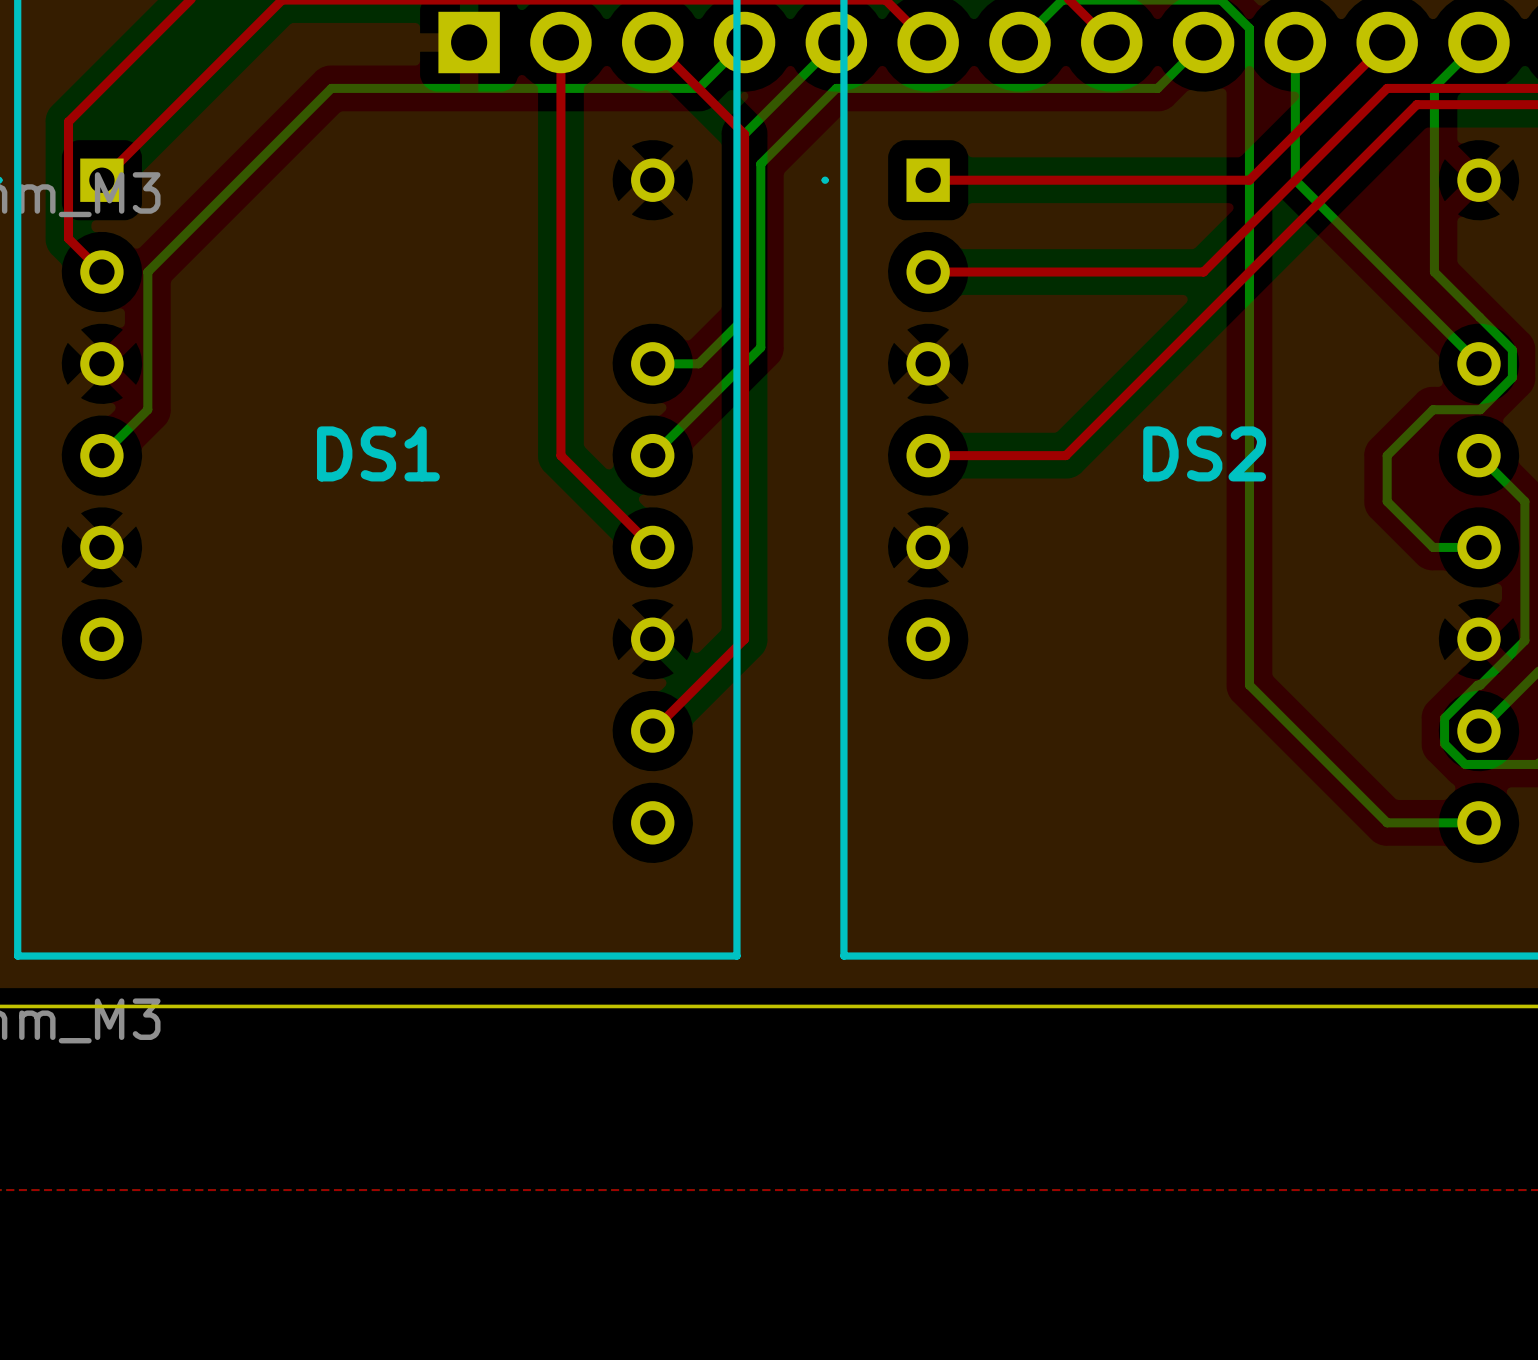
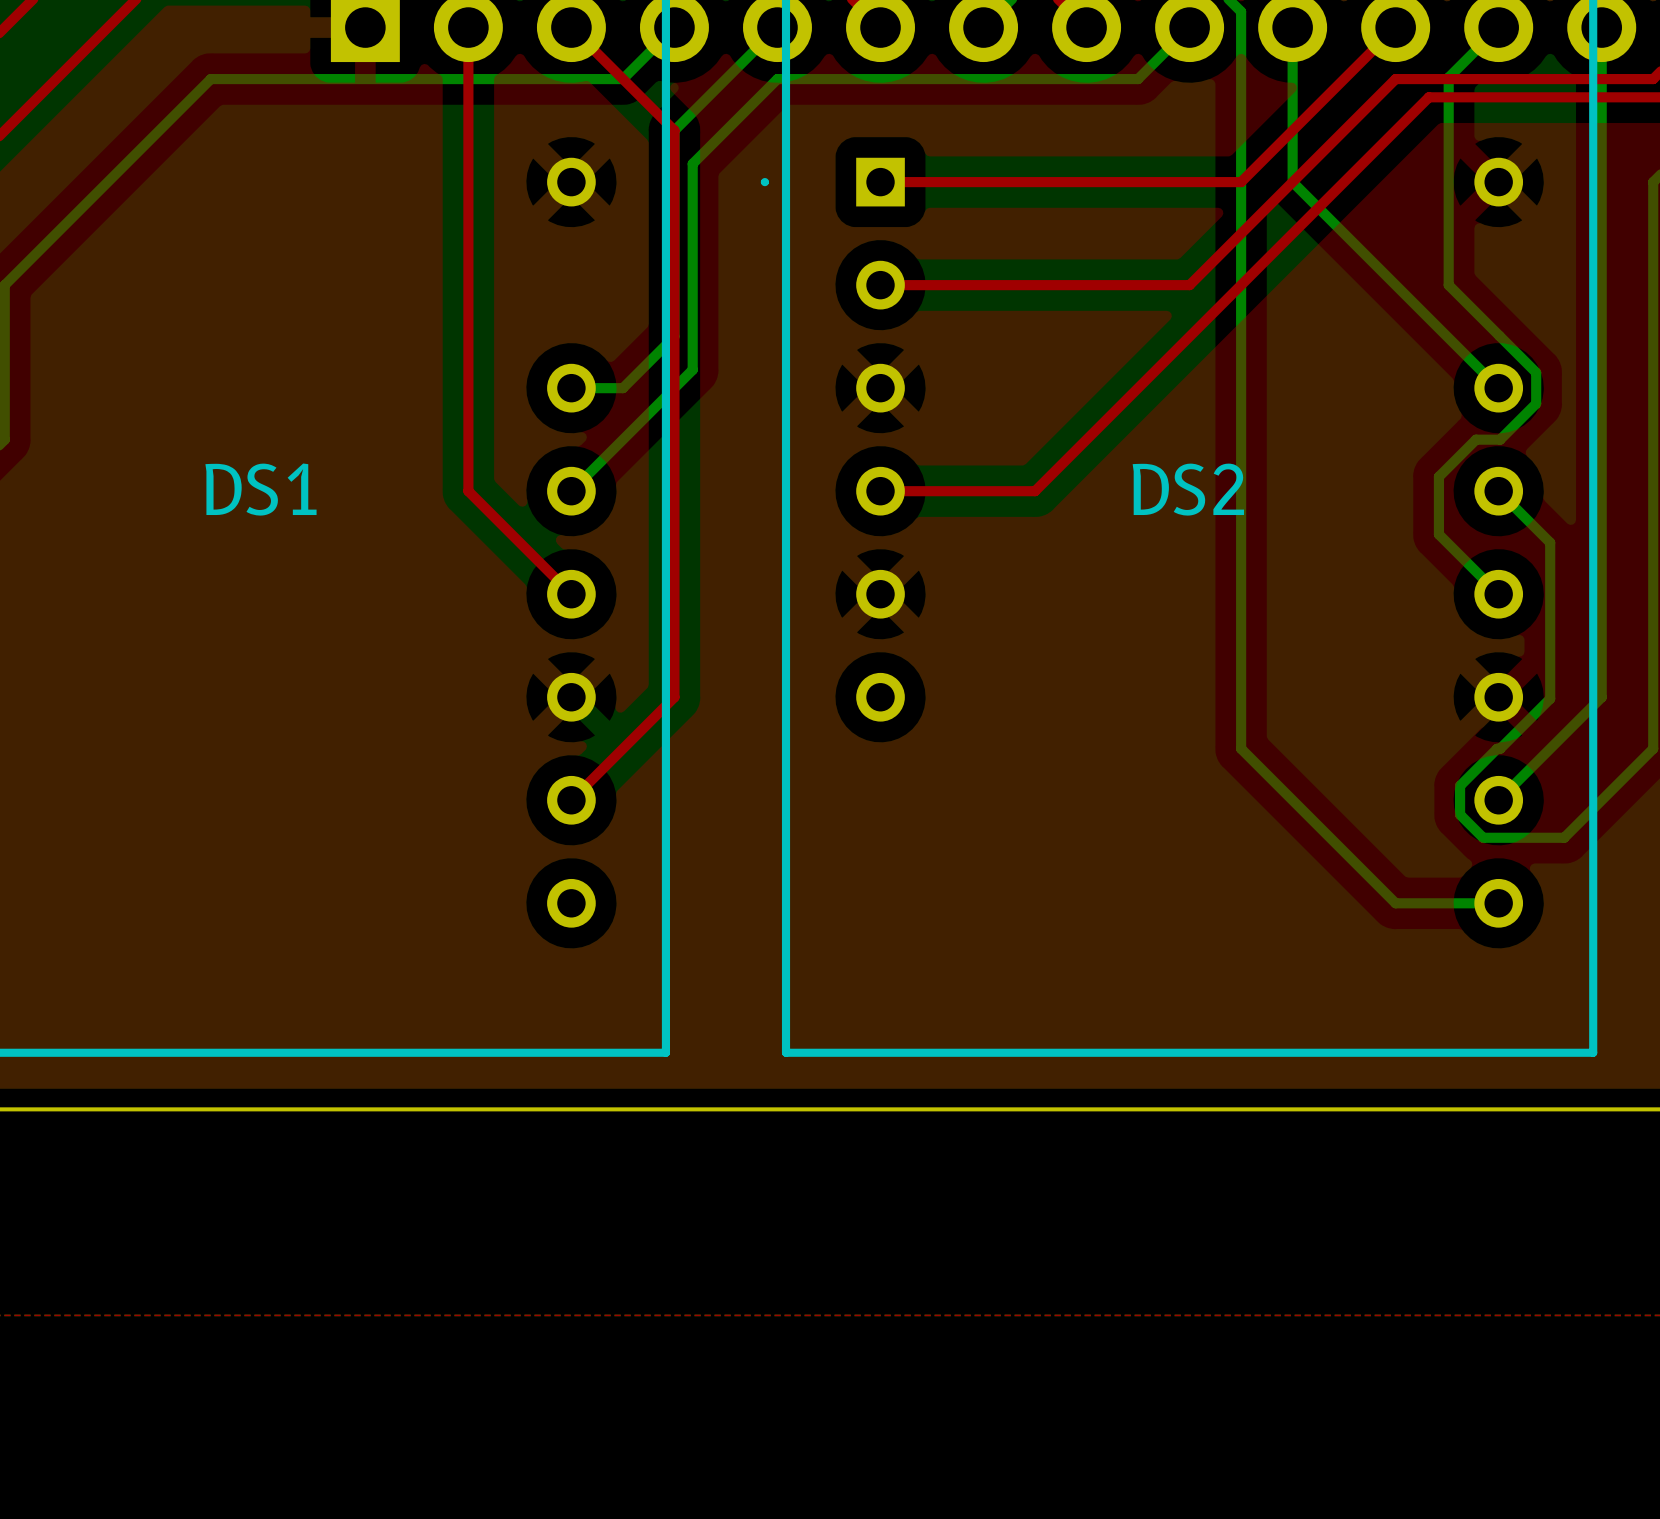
bottom track: (1458, 409) (1433, 409) (1387, 455) (1387, 501) (1433, 547) (1478, 547) -> (1476, 439) (1438, 476) (1438, 534) (1498, 594)

